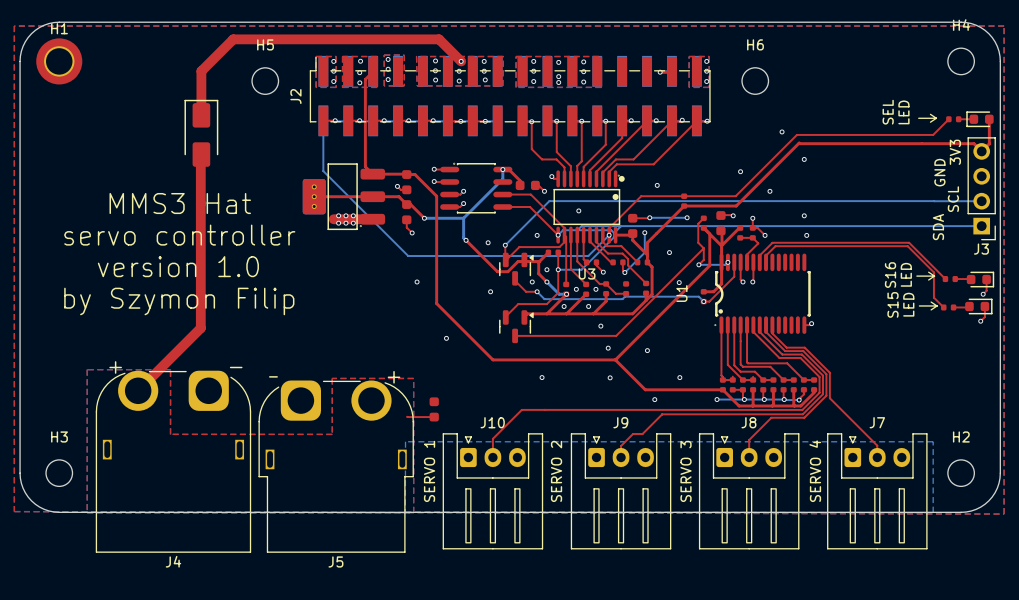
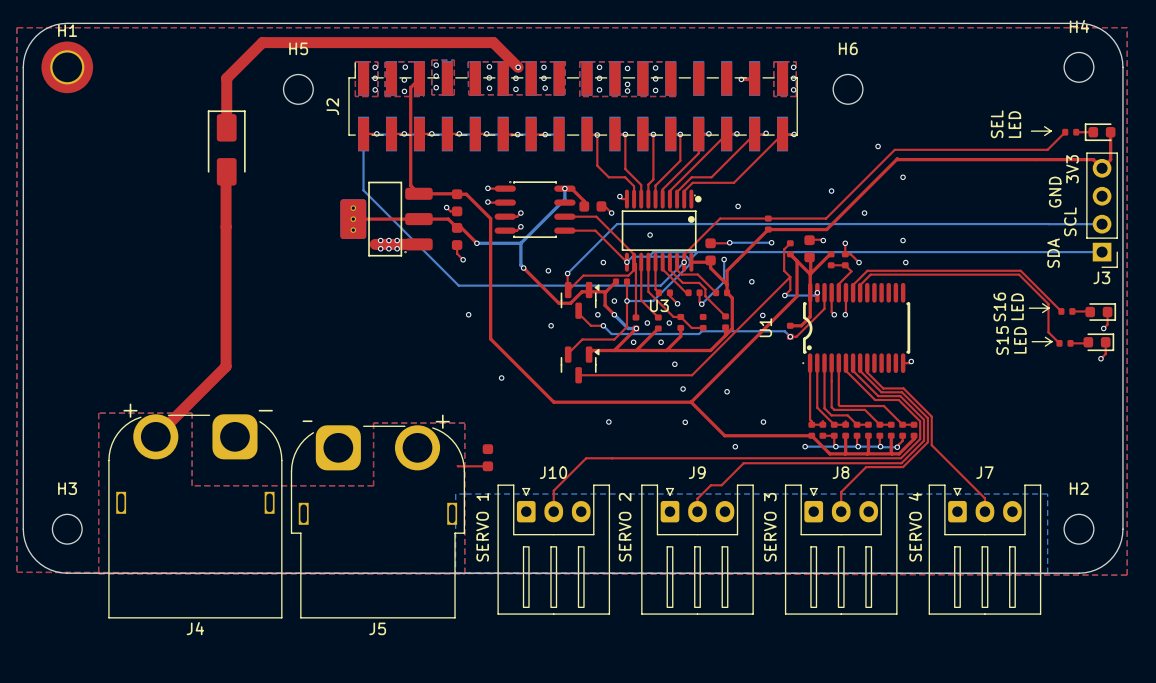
text: MMS3 Hat (180, 203) -> none
text: servo controller (179, 235) -> none
text: version 1.0 (178, 266) -> none
text: by Szymon Filip (179, 301) -> none

